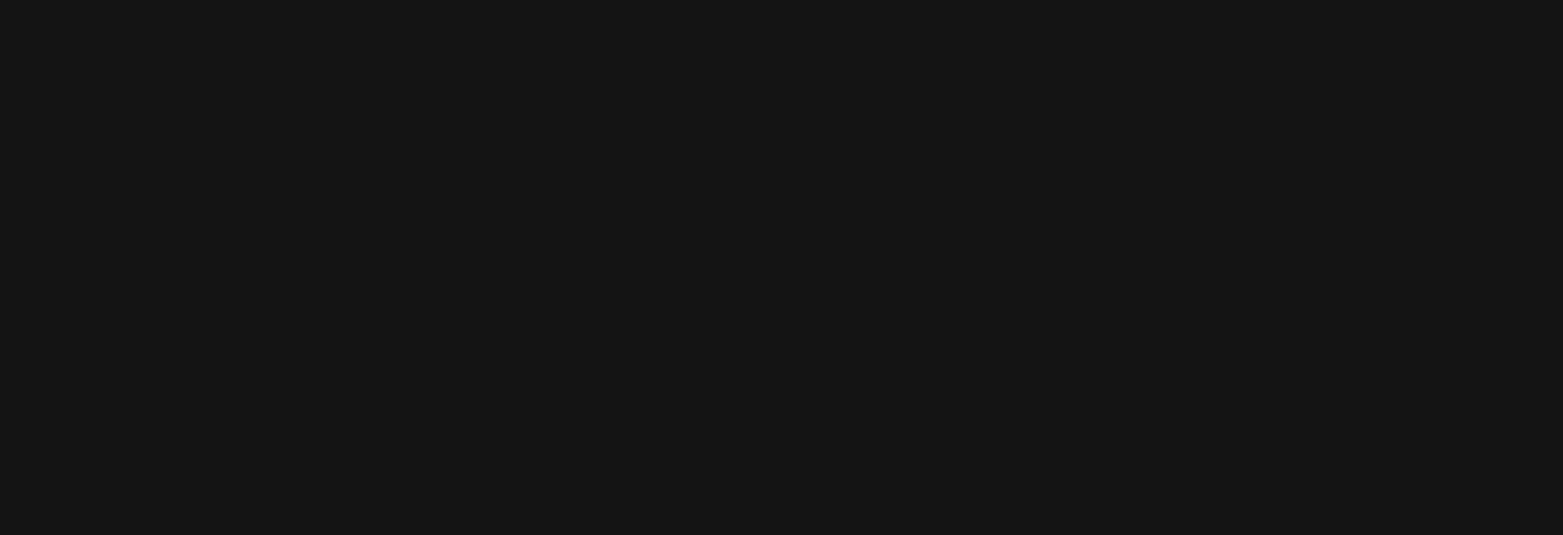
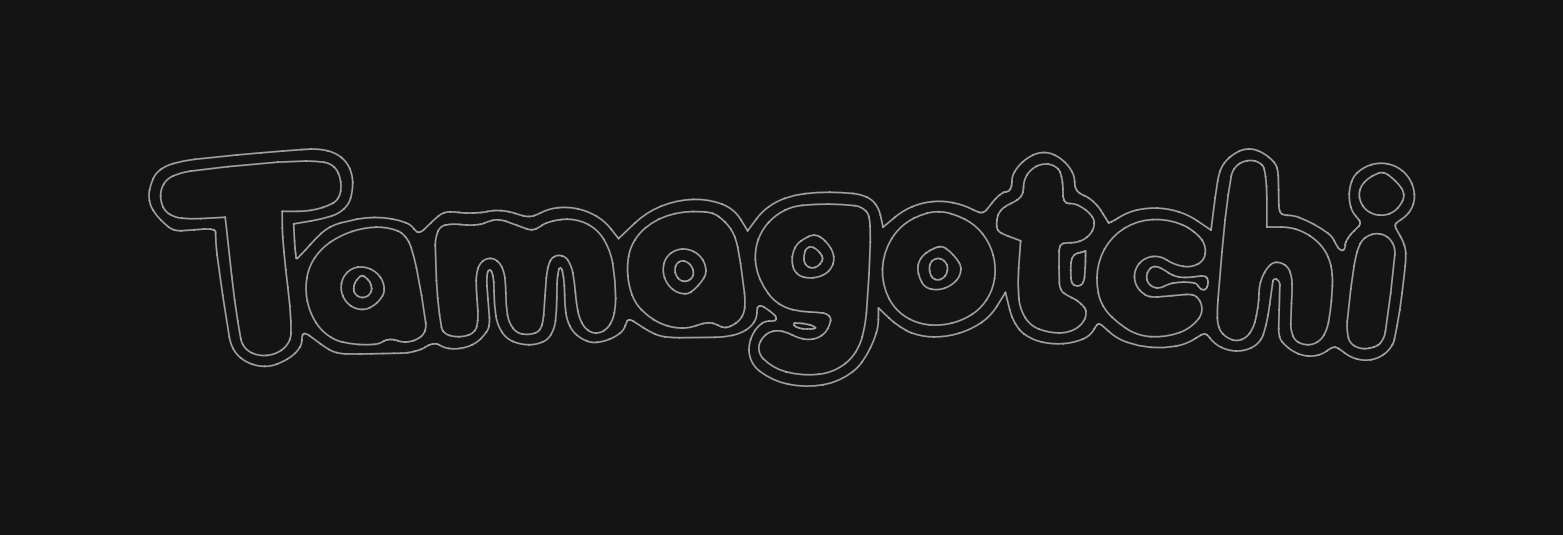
board edge: none -> (310, 149) (183, 161) (160, 169) (155, 175) (151, 184) (149, 195) (150, 205) (156, 215) (168, 226) (177, 230) (207, 229) (215, 231) (230, 343) (238, 355) (254, 365) (270, 365) (287, 359) (299, 348) (304, 333) (330, 350) (345, 353) (407, 352) (433, 343) (451, 348) (469, 346) (480, 338) (488, 327) (486, 281) (489, 270) (493, 279) (495, 316) (502, 332) (508, 339) (516, 342) (529, 344) (539, 343) (548, 337) (553, 327) (557, 279) (560, 268) (563, 277) (568, 322) (576, 334) (589, 341) (600, 341) (614, 336) (622, 331) (629, 319) (654, 333) (664, 336) (715, 337) (732, 335) (750, 326) (755, 319) (757, 307) (762, 306) (774, 315) (776, 318) (762, 322) (753, 332) (749, 347) (751, 361) (757, 369) (765, 375) (780, 382) (796, 385) (814, 385) (831, 382) (855, 369) (866, 355) (873, 340) (877, 326) (878, 307) (894, 322) (911, 332) (928, 336) (946, 335) (965, 331) (981, 322) (993, 311) (1005, 292) (1010, 313) (1017, 326) (1028, 336) (1041, 341) (1057, 343) (1078, 340) (1089, 334) (1098, 324) (1117, 337) (1138, 345) (1163, 347) (1175, 346) (1204, 334) (1224, 348) (1243, 350) (1254, 345) (1262, 336) (1268, 314) (1272, 281) (1275, 279) (1279, 284) (1279, 336) (1288, 348) (1300, 354) (1310, 356) (1320, 354) (1335, 347) (1353, 357) (1371, 359) (1386, 352) (1394, 340) (1405, 259) (1404, 244) (1395, 225) (1410, 210) (1414, 196) (1410, 179) (1395, 166) (1375, 163) (1360, 170) (1352, 179) (1349, 194) (1351, 209) (1359, 223) (1349, 236) (1344, 249) (1341, 250) (1330, 235) (1321, 228) (1299, 217) (1280, 213) (1275, 164) (1260, 152) (1246, 149) (1231, 155) (1221, 168) (1211, 230) (1188, 215) (1162, 208) (1136, 210) (1108, 222) (1095, 203) (1076, 190) (1073, 174) (1066, 164) (1054, 154) (1043, 152) (1033, 154) (1020, 164) (1013, 174) (1009, 189) (999, 195) (983, 212) (979, 212) (952, 202) (926, 202) (903, 211) (883, 227) (878, 209) (871, 200) (860, 194) (841, 192) (804, 193) (780, 200) (762, 212) (747, 230) (735, 213) (722, 204) (700, 199) (676, 201) (647, 213) (618, 238) (600, 218) (587, 211) (573, 207) (553, 208) (529, 216) (501, 210) (473, 213) (448, 211) (439, 215) (419, 232) (405, 222) (382, 217) (365, 217) (340, 222) (325, 230) (296, 258) (293, 223) (321, 218) (338, 213) (348, 203) (352, 190) (350, 171) (343, 159) (331, 151) (310, 149)
board edge: none -> (1247, 160) (1236, 166) (1231, 176) (1217, 300) (1218, 327) (1225, 335) (1233, 340) (1241, 339) (1248, 334) (1254, 322) (1262, 277) (1270, 264) (1279, 262) (1287, 267) (1291, 277) (1290, 324) (1293, 336) (1300, 343) (1314, 343) (1323, 336) (1328, 322) (1332, 285) (1329, 261) (1320, 245) (1306, 233) (1288, 227) (1266, 227) (1266, 186) (1263, 167) (1257, 161) (1247, 160)
board edge: none -> (306, 161) (186, 171) (169, 178) (161, 189) (160, 198) (163, 206) (172, 215) (191, 218) (225, 217) (241, 340) (246, 349) (255, 354) (267, 355) (277, 352) (286, 345) (290, 336) (282, 211) (304, 211) (322, 207) (335, 201) (340, 193) (339, 177) (333, 166) (325, 162) (306, 161)
board edge: none -> (1047, 164) (1038, 165) (1029, 171) (1025, 178) (1021, 195) (1000, 210) (997, 217) (996, 226) (1000, 232) (1020, 240) (1018, 298) (1025, 317) (1038, 328) (1062, 332) (1079, 326) (1085, 313) (1081, 303) (1060, 289) (1059, 247) (1062, 243) (1077, 241) (1085, 238) (1092, 230) (1094, 221) (1085, 210) (1064, 201) (1059, 171) (1055, 166) (1047, 164)
board edge: none -> (1383, 172) (1375, 174) (1365, 180) (1359, 193) (1364, 207) (1369, 212) (1379, 215) (1393, 211) (1400, 204) (1403, 196) (1398, 184) (1383, 172)
board edge: none -> (828, 204) (797, 206) (780, 212) (765, 226) (756, 244) (755, 259) (758, 274) (763, 286) (773, 299) (788, 308) (824, 313) (830, 318) (826, 330) (815, 338) (803, 338) (777, 330) (769, 332) (763, 337) (758, 346) (760, 355) (773, 366) (785, 371) (810, 374) (832, 370) (851, 358) (862, 336) (866, 313) (869, 273) (868, 216) (865, 210) (858, 206) (828, 204)
board edge: none -> (693, 211) (708, 212) (718, 216) (730, 229) (736, 242) (744, 292) (744, 307) (739, 320) (728, 327) (709, 322) (682, 328) (664, 324) (653, 319) (641, 309) (630, 290) (627, 261) (630, 247) (637, 236) (644, 228) (658, 219) (675, 213) (693, 211)
board edge: none -> (938, 211) (920, 215) (901, 226) (887, 245) (882, 268) (885, 291) (894, 306) (909, 319) (929, 324) (951, 323) (976, 311) (989, 294) (995, 272) (991, 249) (978, 229) (958, 216) (938, 211)
board edge: none -> (567, 219) (549, 221) (532, 229) (498, 219) (477, 224) (453, 224) (441, 227) (436, 234) (435, 245) (437, 298) (443, 331) (449, 335) (458, 336) (469, 334) (475, 329) (477, 315) (477, 271) (481, 262) (490, 258) (498, 262) (503, 272) (507, 314) (511, 325) (520, 333) (528, 334) (537, 331) (543, 319) (547, 267) (551, 258) (558, 255) (566, 258) (570, 266) (577, 310) (583, 325) (593, 332) (600, 332) (605, 329) (612, 318) (615, 298) (612, 263) (609, 250) (601, 236) (594, 228) (583, 222) (567, 219)
board edge: none -> (1152, 219) (1130, 224) (1113, 237) (1104, 249) (1098, 262) (1097, 285) (1103, 305) (1118, 322) (1137, 334) (1158, 336) (1179, 332) (1190, 326) (1200, 315) (1201, 304) (1197, 297) (1192, 294) (1153, 296) (1144, 294) (1138, 288) (1135, 281) (1136, 267) (1145, 258) (1154, 256) (1178, 265) (1193, 265) (1202, 260) (1205, 251) (1200, 238) (1187, 227) (1167, 220) (1152, 219)
board edge: none -> (375, 227) (351, 231) (330, 242) (314, 258) (307, 272) (306, 295) (313, 317) (322, 330) (339, 341) (366, 344) (376, 344) (390, 339) (407, 341) (419, 337) (424, 331) (425, 322) (421, 295) (410, 244) (405, 236) (398, 231) (375, 227)
board edge: none -> (1380, 233) (1370, 235) (1362, 240) (1354, 265) (1347, 329) (1350, 342) (1360, 348) (1369, 348) (1378, 344) (1385, 331) (1394, 250) (1390, 239) (1380, 233)
board edge: none -> (814, 235) (799, 242) (792, 254) (793, 268) (797, 274) (803, 277) (812, 277) (824, 274) (830, 268) (833, 261) (832, 252) (828, 244) (820, 237) (814, 235)
board edge: none -> (940, 246) (924, 253) (918, 263) (918, 271) (921, 282) (930, 289) (947, 286) (956, 280) (960, 273) (960, 265) (956, 258) (946, 248) (940, 246)
board edge: none -> (808, 247) (805, 251) (804, 261) (808, 266) (814, 267) (819, 264) (822, 257) (815, 248) (808, 247)
board edge: none -> (682, 249) (674, 250) (668, 255) (664, 263) (663, 272) (670, 287) (678, 292) (686, 293) (691, 291) (701, 281) (705, 268) (698, 255) (692, 250) (682, 249)
board edge: none -> (1085, 251) (1075, 254) (1071, 260) (1071, 279) (1075, 285) (1081, 284) (1084, 279) (1085, 251)
board edge: none -> (940, 258) (933, 259) (929, 265) (930, 275) (936, 279) (943, 277) (947, 270) (945, 262) (940, 258)
board edge: none -> (684, 261) (677, 263) (675, 270) (678, 278) (684, 281) (691, 278) (693, 272) (690, 265) (684, 261)
board edge: none -> (1154, 266) (1149, 269) (1146, 276) (1148, 282) (1153, 287) (1159, 287) (1183, 282) (1195, 283) (1202, 289) (1207, 287) (1207, 280) (1205, 276) (1178, 276) (1154, 266)
board edge: none -> (357, 267) (345, 273) (341, 281) (341, 289) (343, 297) (348, 304) (356, 308) (364, 309) (378, 301) (383, 293) (384, 287) (381, 279) (376, 272) (368, 268) (357, 267)
board edge: none -> (362, 275) (355, 281) (353, 289) (356, 294) (362, 297) (369, 294) (371, 288) (368, 280) (362, 275)
board edge: none -> (795, 323) (794, 325) (800, 328) (815, 327) (810, 325) (795, 323)

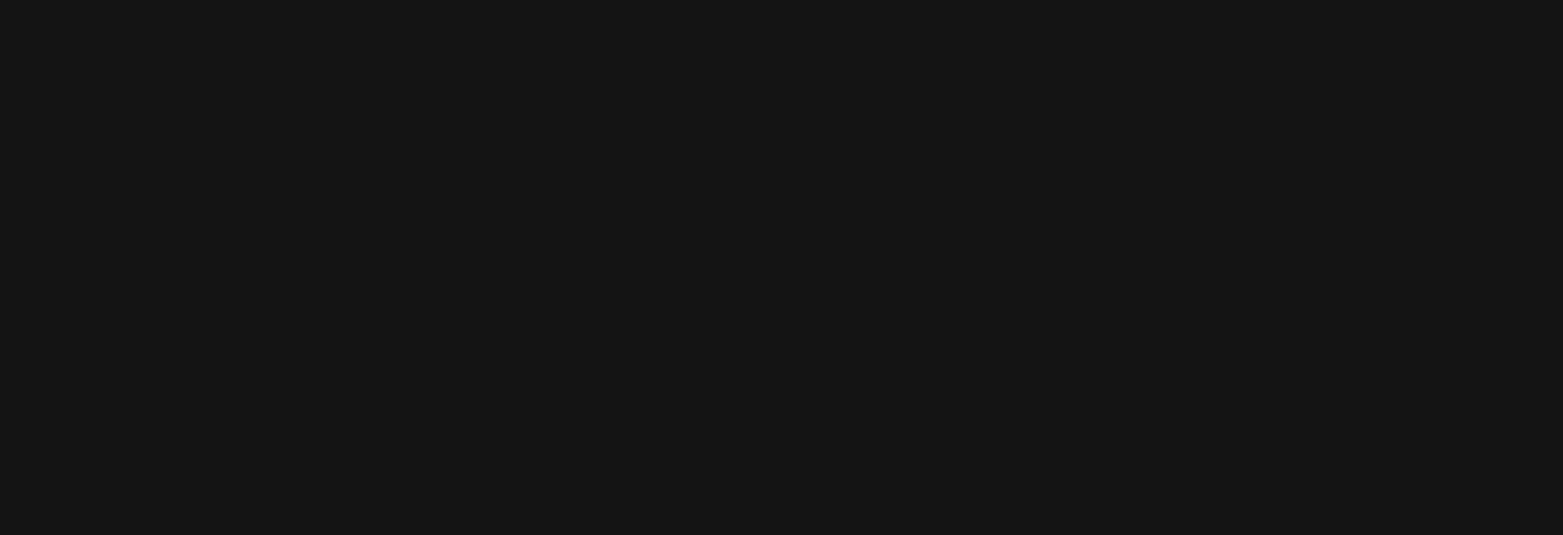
board edge: (310, 149) (183, 161) (160, 169) (155, 175) (151, 184) (149, 195) (150, 205) (156, 215) (168, 226) (177, 230) (207, 229) (215, 231) (230, 343) (238, 355) (254, 365) (270, 365) (287, 359) (299, 348) (304, 333) (330, 350) (345, 353) (407, 352) (433, 343) (451, 348) (469, 346) (480, 338) (488, 327) (486, 281) (489, 270) (493, 279) (495, 316) (502, 332) (508, 339) (516, 342) (529, 344) (539, 343) (548, 337) (553, 327) (557, 279) (560, 268) (563, 277) (568, 322) (576, 334) (589, 341) (600, 341) (614, 336) (622, 331) (629, 319) (654, 333) (664, 336) (715, 337) (732, 335) (750, 326) (755, 319) (757, 307) (762, 306) (774, 315) (776, 318) (762, 322) (753, 332) (749, 347) (751, 361) (757, 369) (765, 375) (780, 382) (796, 385) (814, 385) (831, 382) (855, 369) (866, 355) (873, 340) (877, 326) (878, 307) (894, 322) (911, 332) (928, 336) (946, 335) (965, 331) (981, 322) (993, 311) (1005, 292) (1010, 313) (1017, 326) (1028, 336) (1041, 341) (1057, 343) (1078, 340) (1089, 334) (1098, 324) (1117, 337) (1138, 345) (1163, 347) (1175, 346) (1204, 334) (1224, 348) (1243, 350) (1254, 345) (1262, 336) (1268, 314) (1272, 281) (1275, 279) (1279, 284) (1279, 336) (1288, 348) (1300, 354) (1310, 356) (1320, 354) (1335, 347) (1353, 357) (1371, 359) (1386, 352) (1394, 340) (1405, 259) (1404, 244) (1395, 225) (1410, 210) (1414, 196) (1410, 179) (1395, 166) (1375, 163) (1360, 170) (1352, 179) (1349, 194) (1351, 209) (1359, 223) (1349, 236) (1344, 249) (1341, 250) (1330, 235) (1321, 228) (1299, 217) (1280, 213) (1275, 164) (1260, 152) (1246, 149) (1231, 155) (1221, 168) (1211, 230) (1188, 215) (1162, 208) (1136, 210) (1108, 222) (1095, 203) (1076, 190) (1073, 174) (1066, 164) (1054, 154) (1043, 152) (1033, 154) (1020, 164) (1013, 174) (1009, 189) (999, 195) (983, 212) (979, 212) (952, 202) (926, 202) (903, 211) (883, 227) (878, 209) (871, 200) (860, 194) (841, 192) (804, 193) (780, 200) (762, 212) (747, 230) (735, 213) (722, 204) (700, 199) (676, 201) (647, 213) (618, 238) (600, 218) (587, 211) (573, 207) (553, 208) (529, 216) (501, 210) (473, 213) (448, 211) (439, 215) (419, 232) (405, 222) (382, 217) (365, 217) (340, 222) (325, 230) (296, 258) (293, 223) (321, 218) (338, 213) (348, 203) (352, 190) (350, 171) (343, 159) (331, 151) (310, 149) -> none
board edge: (1247, 160) (1236, 166) (1231, 176) (1217, 300) (1218, 327) (1225, 335) (1233, 340) (1241, 339) (1248, 334) (1254, 322) (1262, 277) (1270, 264) (1279, 262) (1287, 267) (1291, 277) (1290, 324) (1293, 336) (1300, 343) (1314, 343) (1323, 336) (1328, 322) (1332, 285) (1329, 261) (1320, 245) (1306, 233) (1288, 227) (1266, 227) (1266, 186) (1263, 167) (1257, 161) (1247, 160) -> none
board edge: (306, 161) (186, 171) (169, 178) (161, 189) (160, 198) (163, 206) (172, 215) (191, 218) (225, 217) (241, 340) (246, 349) (255, 354) (267, 355) (277, 352) (286, 345) (290, 336) (282, 211) (304, 211) (322, 207) (335, 201) (340, 193) (339, 177) (333, 166) (325, 162) (306, 161) -> none
board edge: (1047, 164) (1038, 165) (1029, 171) (1025, 178) (1021, 195) (1000, 210) (997, 217) (996, 226) (1000, 232) (1020, 240) (1018, 298) (1025, 317) (1038, 328) (1062, 332) (1079, 326) (1085, 313) (1081, 303) (1060, 289) (1059, 247) (1062, 243) (1077, 241) (1085, 238) (1092, 230) (1094, 221) (1085, 210) (1064, 201) (1059, 171) (1055, 166) (1047, 164) -> none
board edge: (1383, 172) (1375, 174) (1365, 180) (1359, 193) (1364, 207) (1369, 212) (1379, 215) (1393, 211) (1400, 204) (1403, 196) (1398, 184) (1383, 172) -> none
board edge: (828, 204) (797, 206) (780, 212) (765, 226) (756, 244) (755, 259) (758, 274) (763, 286) (773, 299) (788, 308) (824, 313) (830, 318) (826, 330) (815, 338) (803, 338) (777, 330) (769, 332) (763, 337) (758, 346) (760, 355) (773, 366) (785, 371) (810, 374) (832, 370) (851, 358) (862, 336) (866, 313) (869, 273) (868, 216) (865, 210) (858, 206) (828, 204) -> none
board edge: (693, 211) (708, 212) (718, 216) (730, 229) (736, 242) (744, 292) (744, 307) (739, 320) (728, 327) (709, 322) (682, 328) (664, 324) (653, 319) (641, 309) (630, 290) (627, 261) (630, 247) (637, 236) (644, 228) (658, 219) (675, 213) (693, 211) -> none
board edge: (938, 211) (920, 215) (901, 226) (887, 245) (882, 268) (885, 291) (894, 306) (909, 319) (929, 324) (951, 323) (976, 311) (989, 294) (995, 272) (991, 249) (978, 229) (958, 216) (938, 211) -> none
board edge: (567, 219) (549, 221) (532, 229) (498, 219) (477, 224) (453, 224) (441, 227) (436, 234) (435, 245) (437, 298) (443, 331) (449, 335) (458, 336) (469, 334) (475, 329) (477, 315) (477, 271) (481, 262) (490, 258) (498, 262) (503, 272) (507, 314) (511, 325) (520, 333) (528, 334) (537, 331) (543, 319) (547, 267) (551, 258) (558, 255) (566, 258) (570, 266) (577, 310) (583, 325) (593, 332) (600, 332) (605, 329) (612, 318) (615, 298) (612, 263) (609, 250) (601, 236) (594, 228) (583, 222) (567, 219) -> none
board edge: (1152, 219) (1130, 224) (1113, 237) (1104, 249) (1098, 262) (1097, 285) (1103, 305) (1118, 322) (1137, 334) (1158, 336) (1179, 332) (1190, 326) (1200, 315) (1201, 304) (1197, 297) (1192, 294) (1153, 296) (1144, 294) (1138, 288) (1135, 281) (1136, 267) (1145, 258) (1154, 256) (1178, 265) (1193, 265) (1202, 260) (1205, 251) (1200, 238) (1187, 227) (1167, 220) (1152, 219) -> none
board edge: (375, 227) (351, 231) (330, 242) (314, 258) (307, 272) (306, 295) (313, 317) (322, 330) (339, 341) (366, 344) (376, 344) (390, 339) (407, 341) (419, 337) (424, 331) (425, 322) (421, 295) (410, 244) (405, 236) (398, 231) (375, 227) -> none
board edge: (1380, 233) (1370, 235) (1362, 240) (1354, 265) (1347, 329) (1350, 342) (1360, 348) (1369, 348) (1378, 344) (1385, 331) (1394, 250) (1390, 239) (1380, 233) -> none
board edge: (814, 235) (799, 242) (792, 254) (793, 268) (797, 274) (803, 277) (812, 277) (824, 274) (830, 268) (833, 261) (832, 252) (828, 244) (820, 237) (814, 235) -> none
board edge: (940, 246) (924, 253) (918, 263) (918, 271) (921, 282) (930, 289) (947, 286) (956, 280) (960, 273) (960, 265) (956, 258) (946, 248) (940, 246) -> none
board edge: (808, 247) (805, 251) (804, 261) (808, 266) (814, 267) (819, 264) (822, 257) (815, 248) (808, 247) -> none
board edge: (682, 249) (674, 250) (668, 255) (664, 263) (663, 272) (670, 287) (678, 292) (686, 293) (691, 291) (701, 281) (705, 268) (698, 255) (692, 250) (682, 249) -> none
board edge: (1085, 251) (1075, 254) (1071, 260) (1071, 279) (1075, 285) (1081, 284) (1084, 279) (1085, 251) -> none
board edge: (940, 258) (933, 259) (929, 265) (930, 275) (936, 279) (943, 277) (947, 270) (945, 262) (940, 258) -> none
board edge: (684, 261) (677, 263) (675, 270) (678, 278) (684, 281) (691, 278) (693, 272) (690, 265) (684, 261) -> none
board edge: (1154, 266) (1149, 269) (1146, 276) (1148, 282) (1153, 287) (1159, 287) (1183, 282) (1195, 283) (1202, 289) (1207, 287) (1207, 280) (1205, 276) (1178, 276) (1154, 266) -> none
board edge: (357, 267) (345, 273) (341, 281) (341, 289) (343, 297) (348, 304) (356, 308) (364, 309) (378, 301) (383, 293) (384, 287) (381, 279) (376, 272) (368, 268) (357, 267) -> none
board edge: (362, 275) (355, 281) (353, 289) (356, 294) (362, 297) (369, 294) (371, 288) (368, 280) (362, 275) -> none
board edge: (795, 323) (794, 325) (800, 328) (815, 327) (810, 325) (795, 323) -> none

